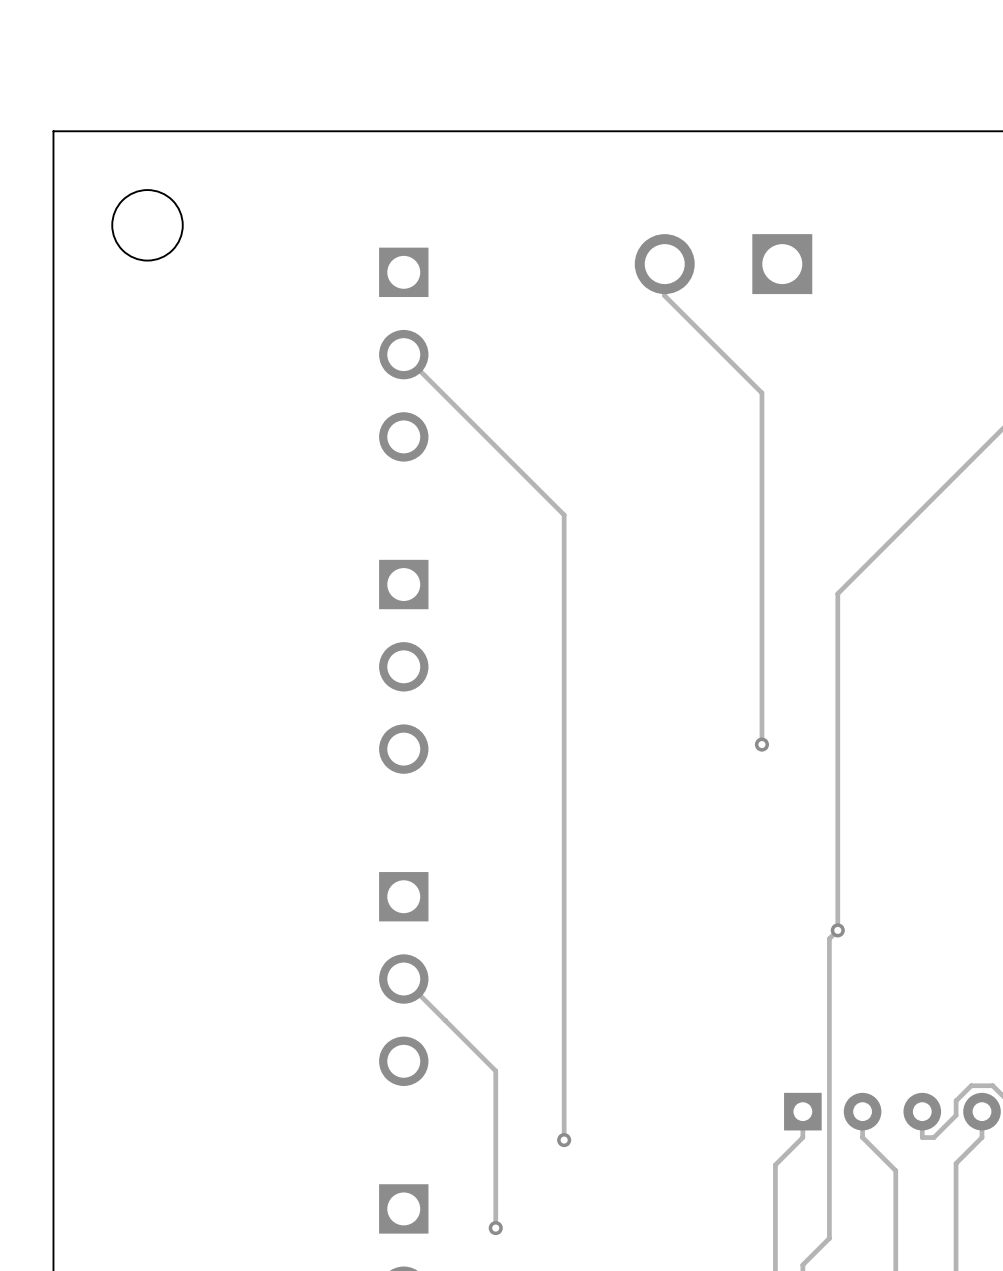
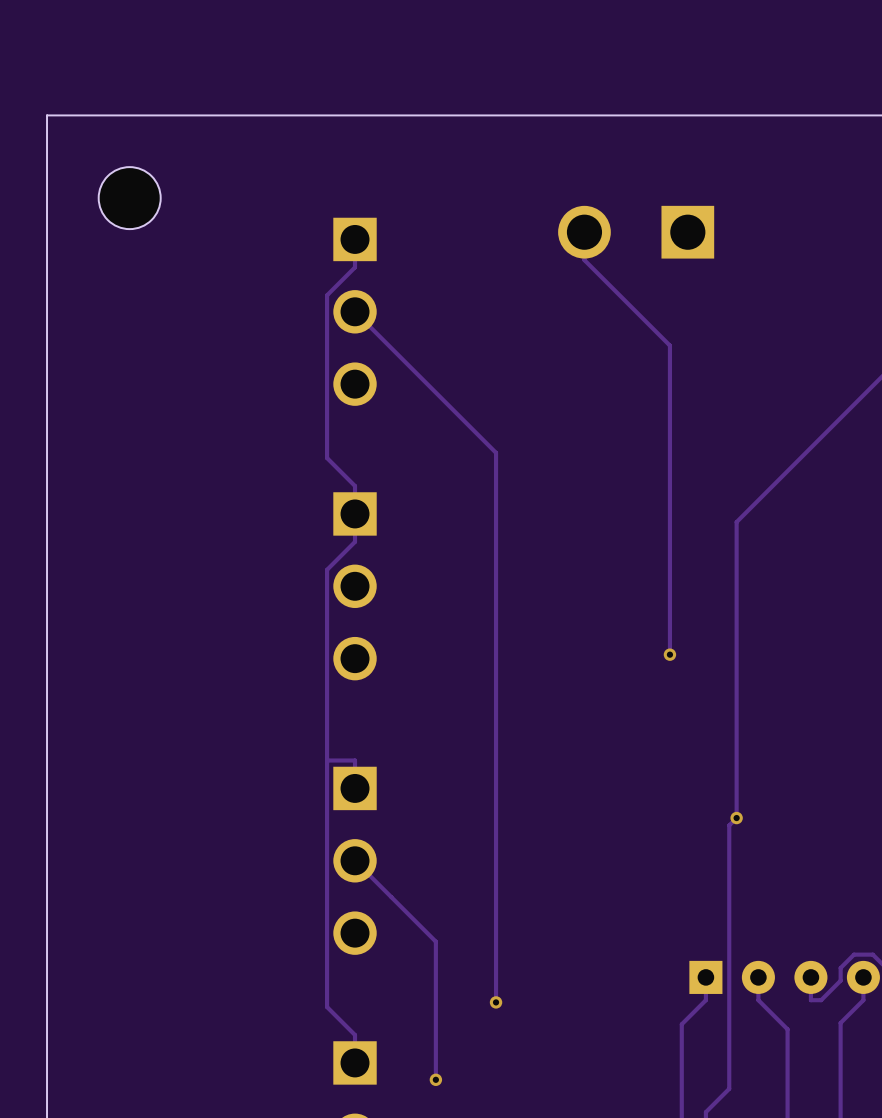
track: none -> (355, 239) (355, 267) (327, 295) (327, 458) (355, 486) (355, 541) (327, 569) (327, 1007) (355, 1035) (355, 1062)
track: none -> (327, 760) (355, 760) (355, 788)

